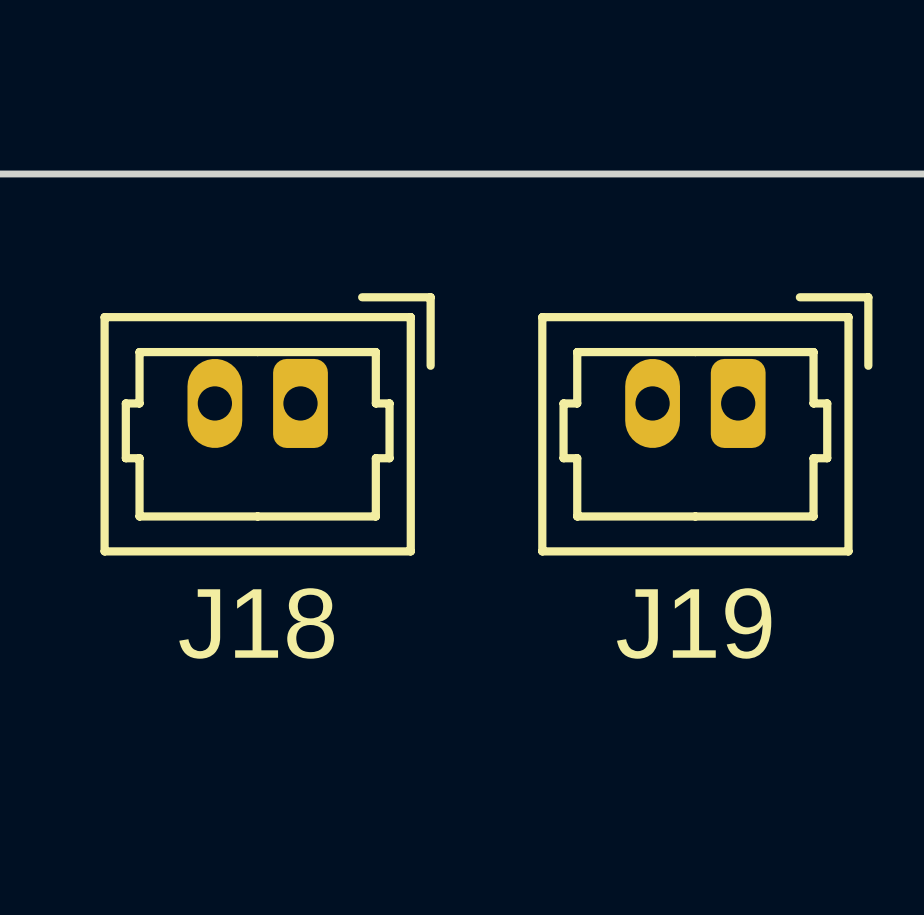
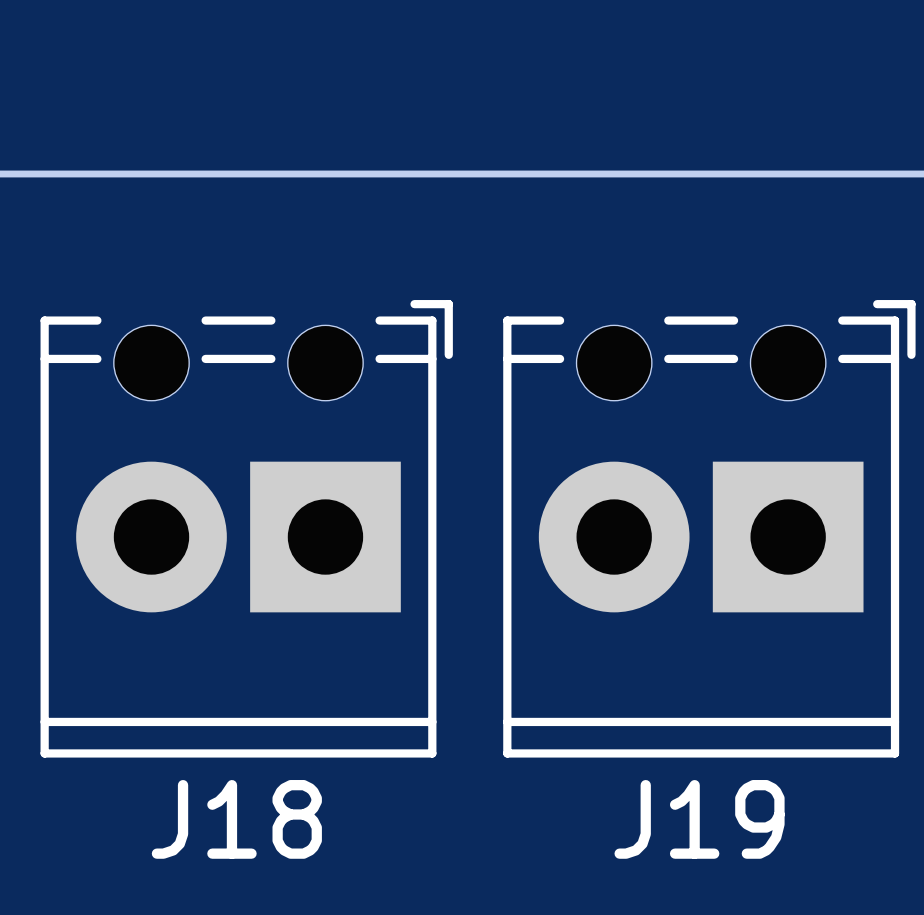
J18 footprint: [100, 293, 435, 556] -> [40, 300, 453, 758]
J19 footprint: [538, 293, 873, 556] -> [503, 300, 916, 758]

